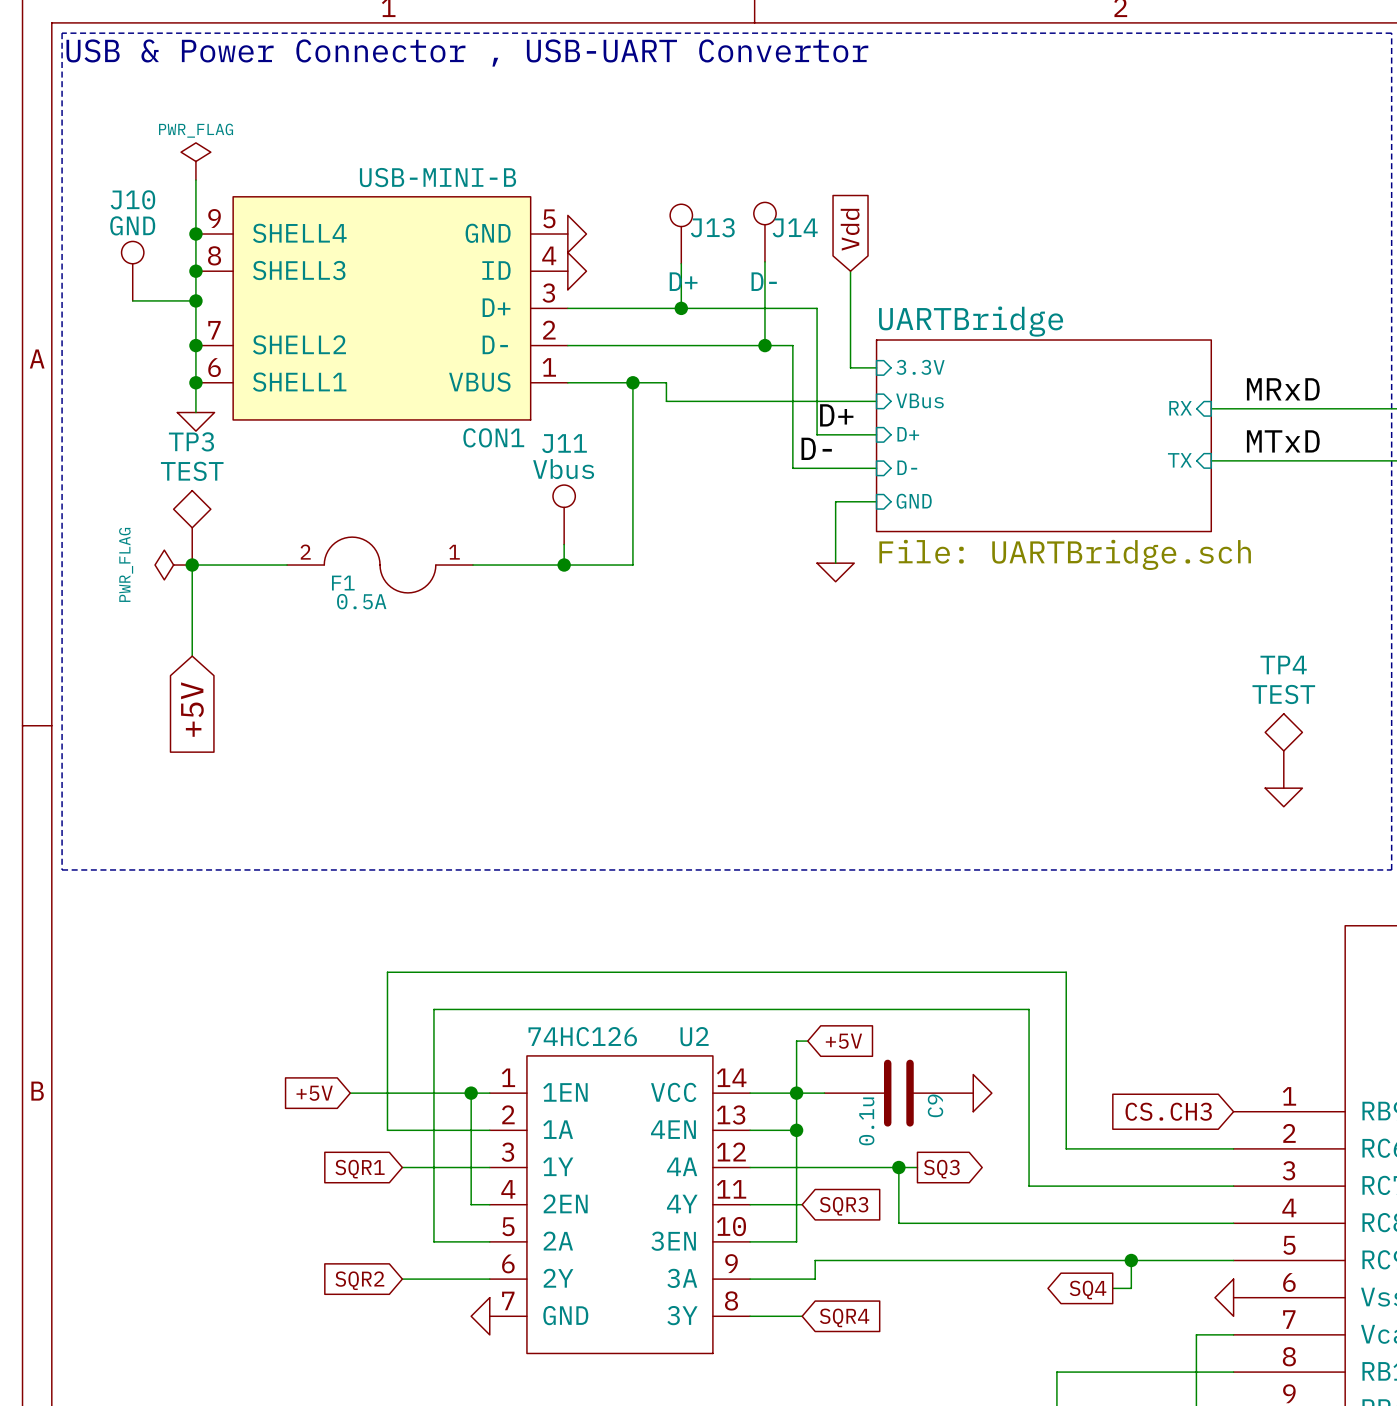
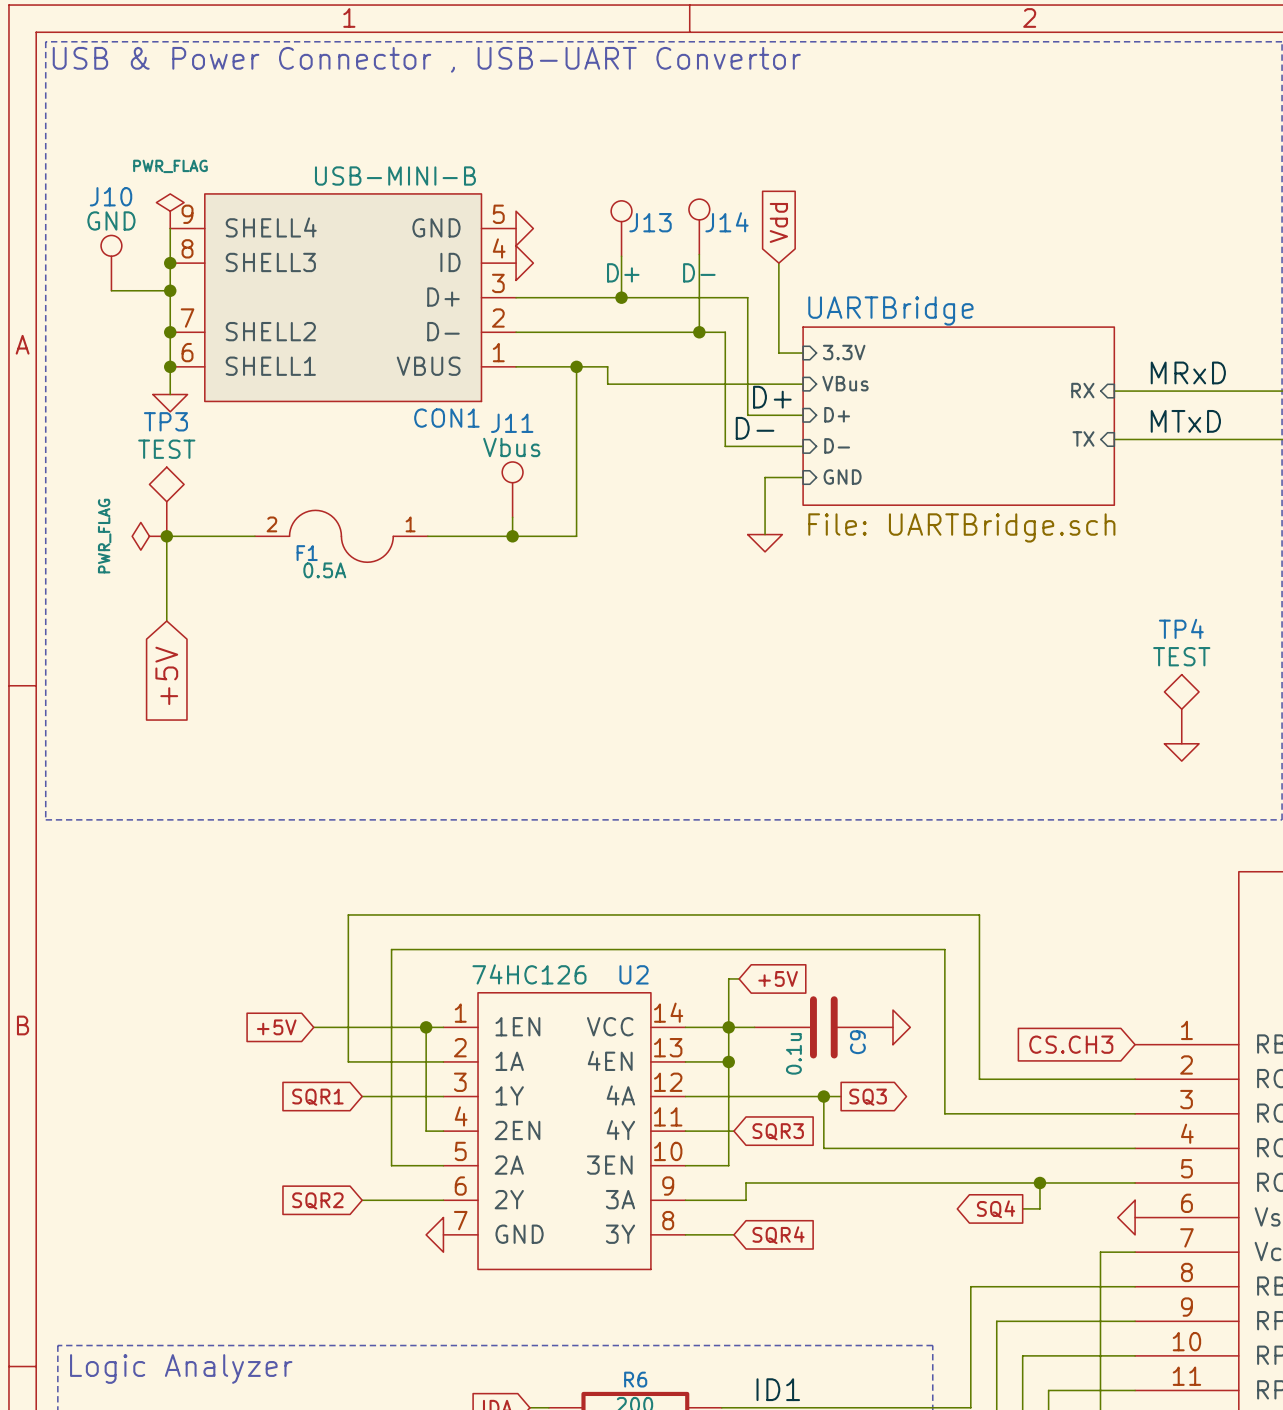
power symbol text position: PWR_FLAG (196, 130) -> PWR_FLAG (170, 166)
power symbol position: PWR_FLAG (195, 161) -> PWR_FLAG (170, 211)
wire: (195, 180) (195, 234) -> none
junction: (195, 234) -> none

